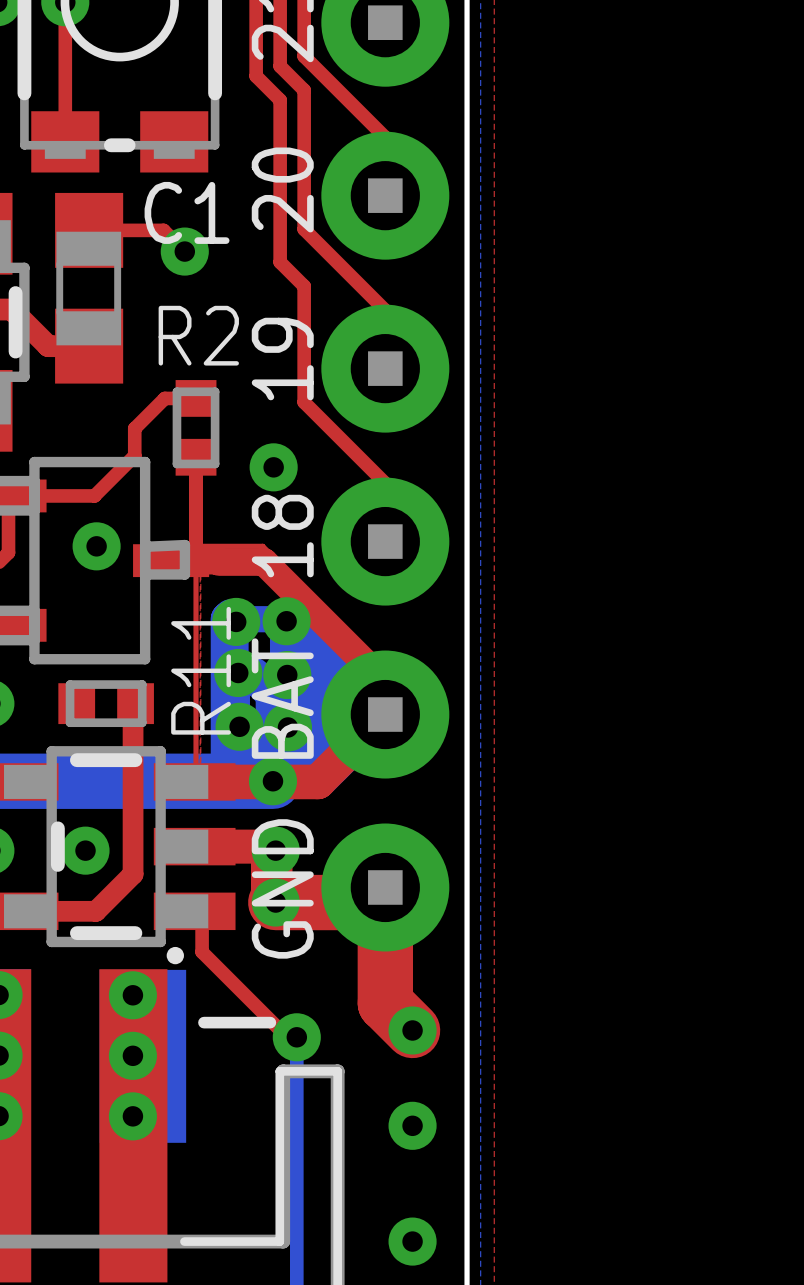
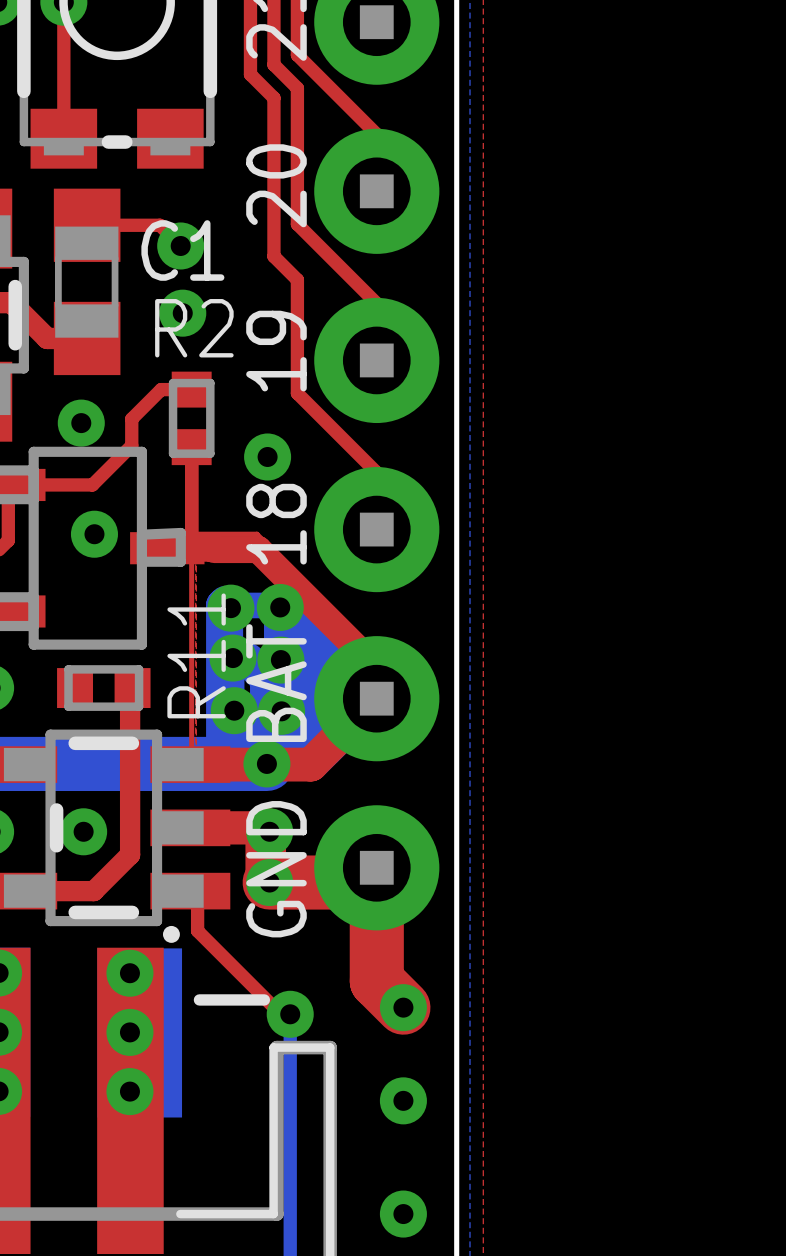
C1 name position: C1 (187, 212) -> C1 (182, 250)
via: none -> (182, 313)
via: none -> (81, 423)

